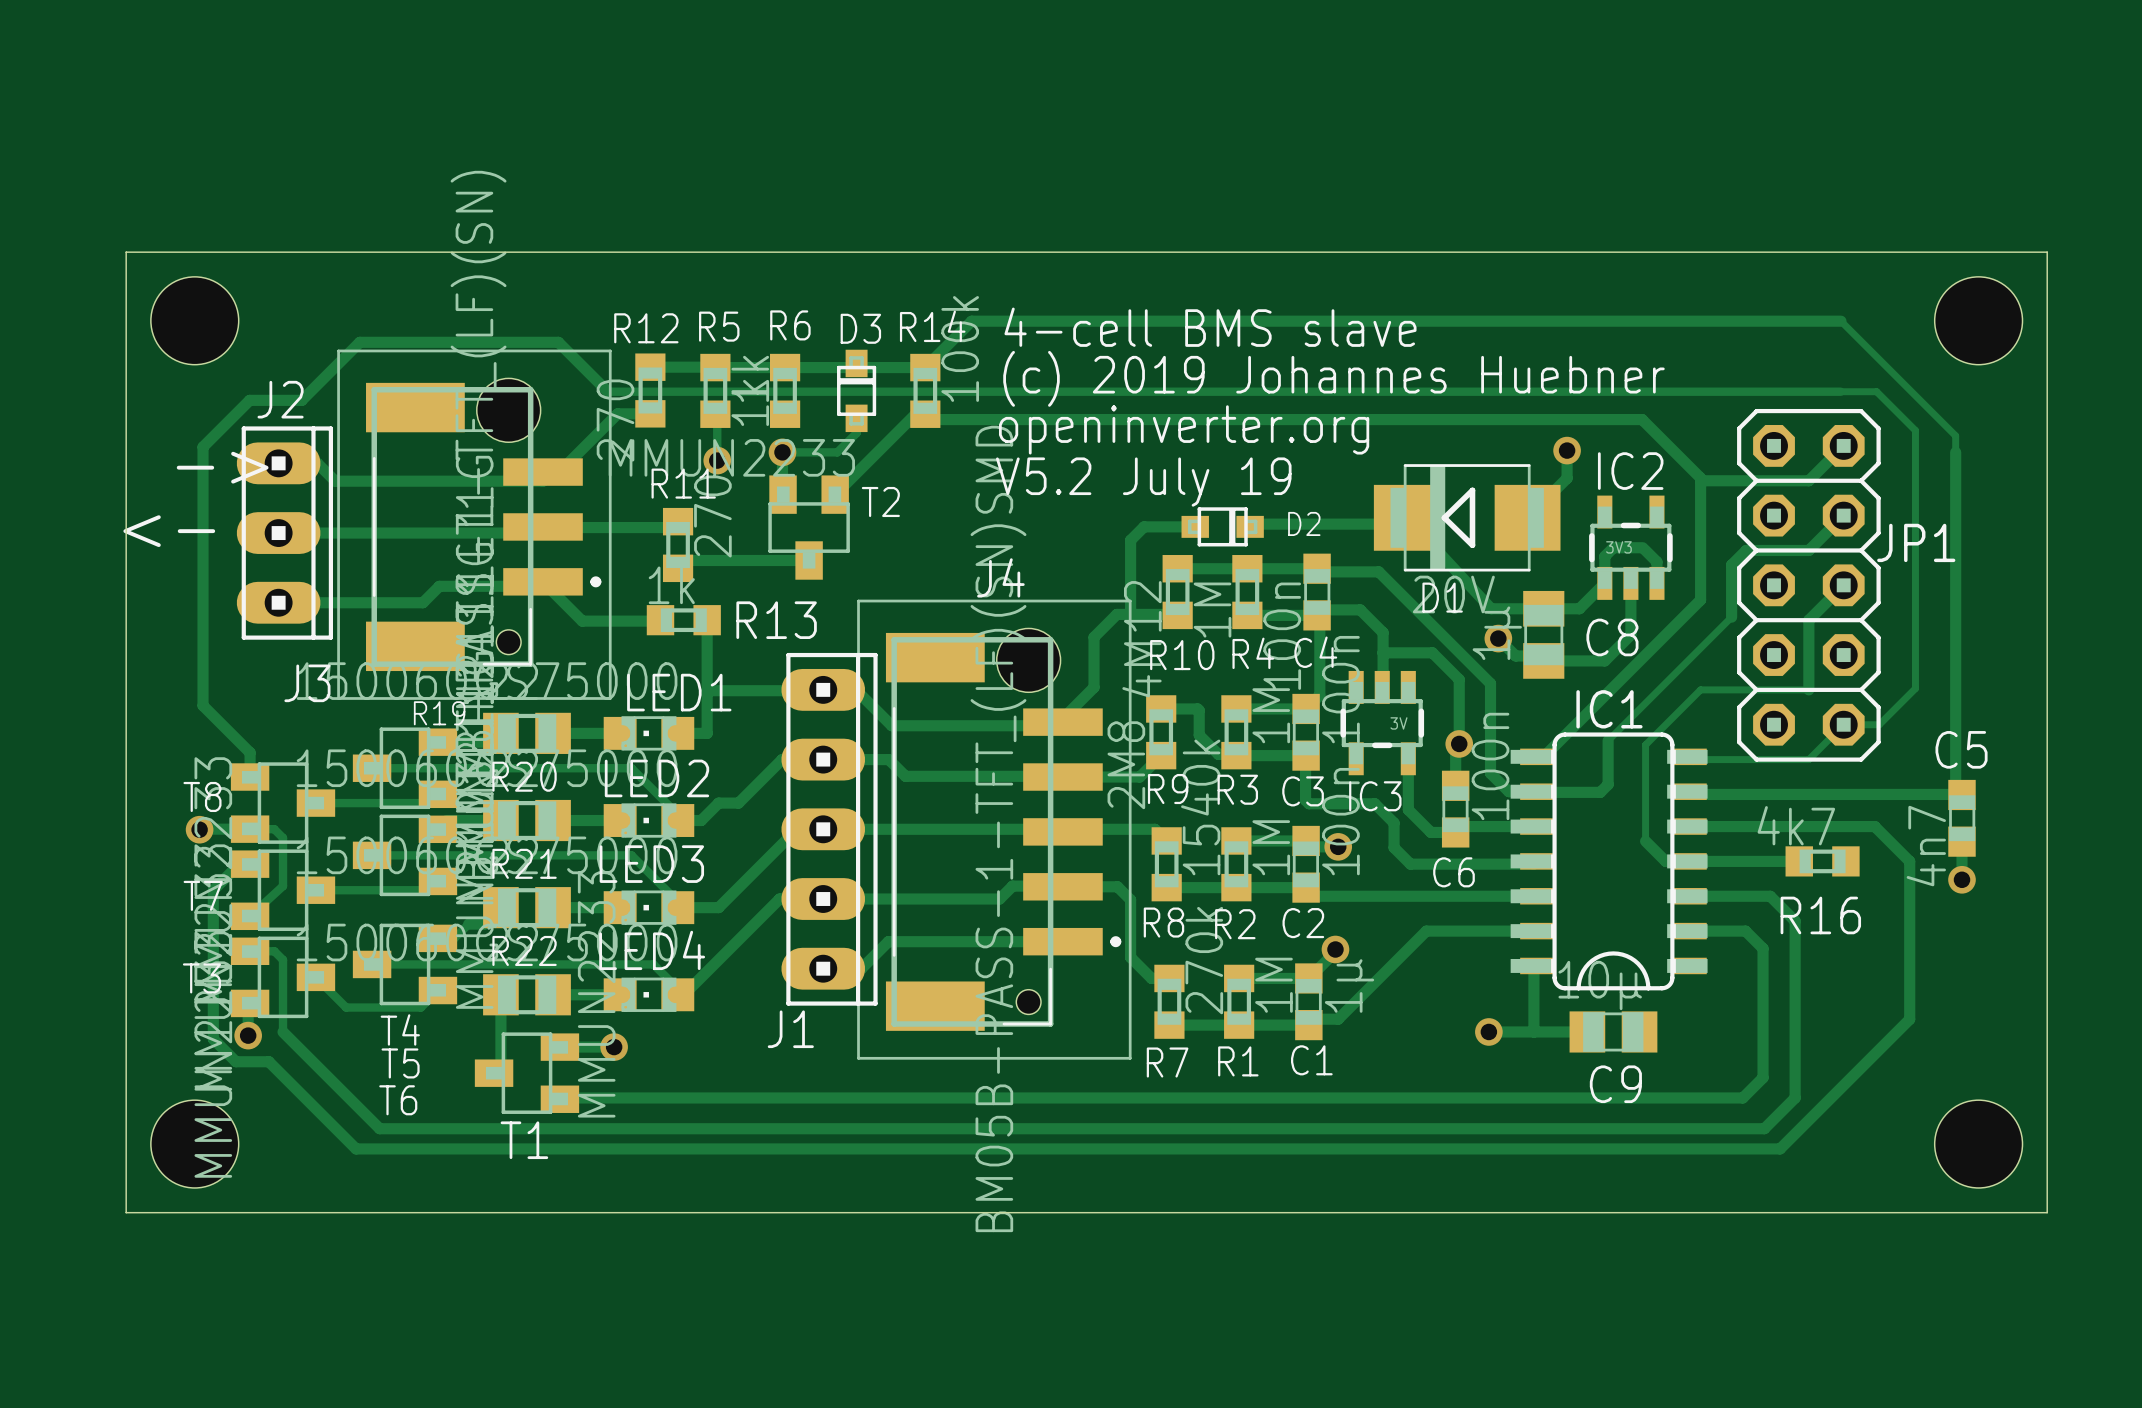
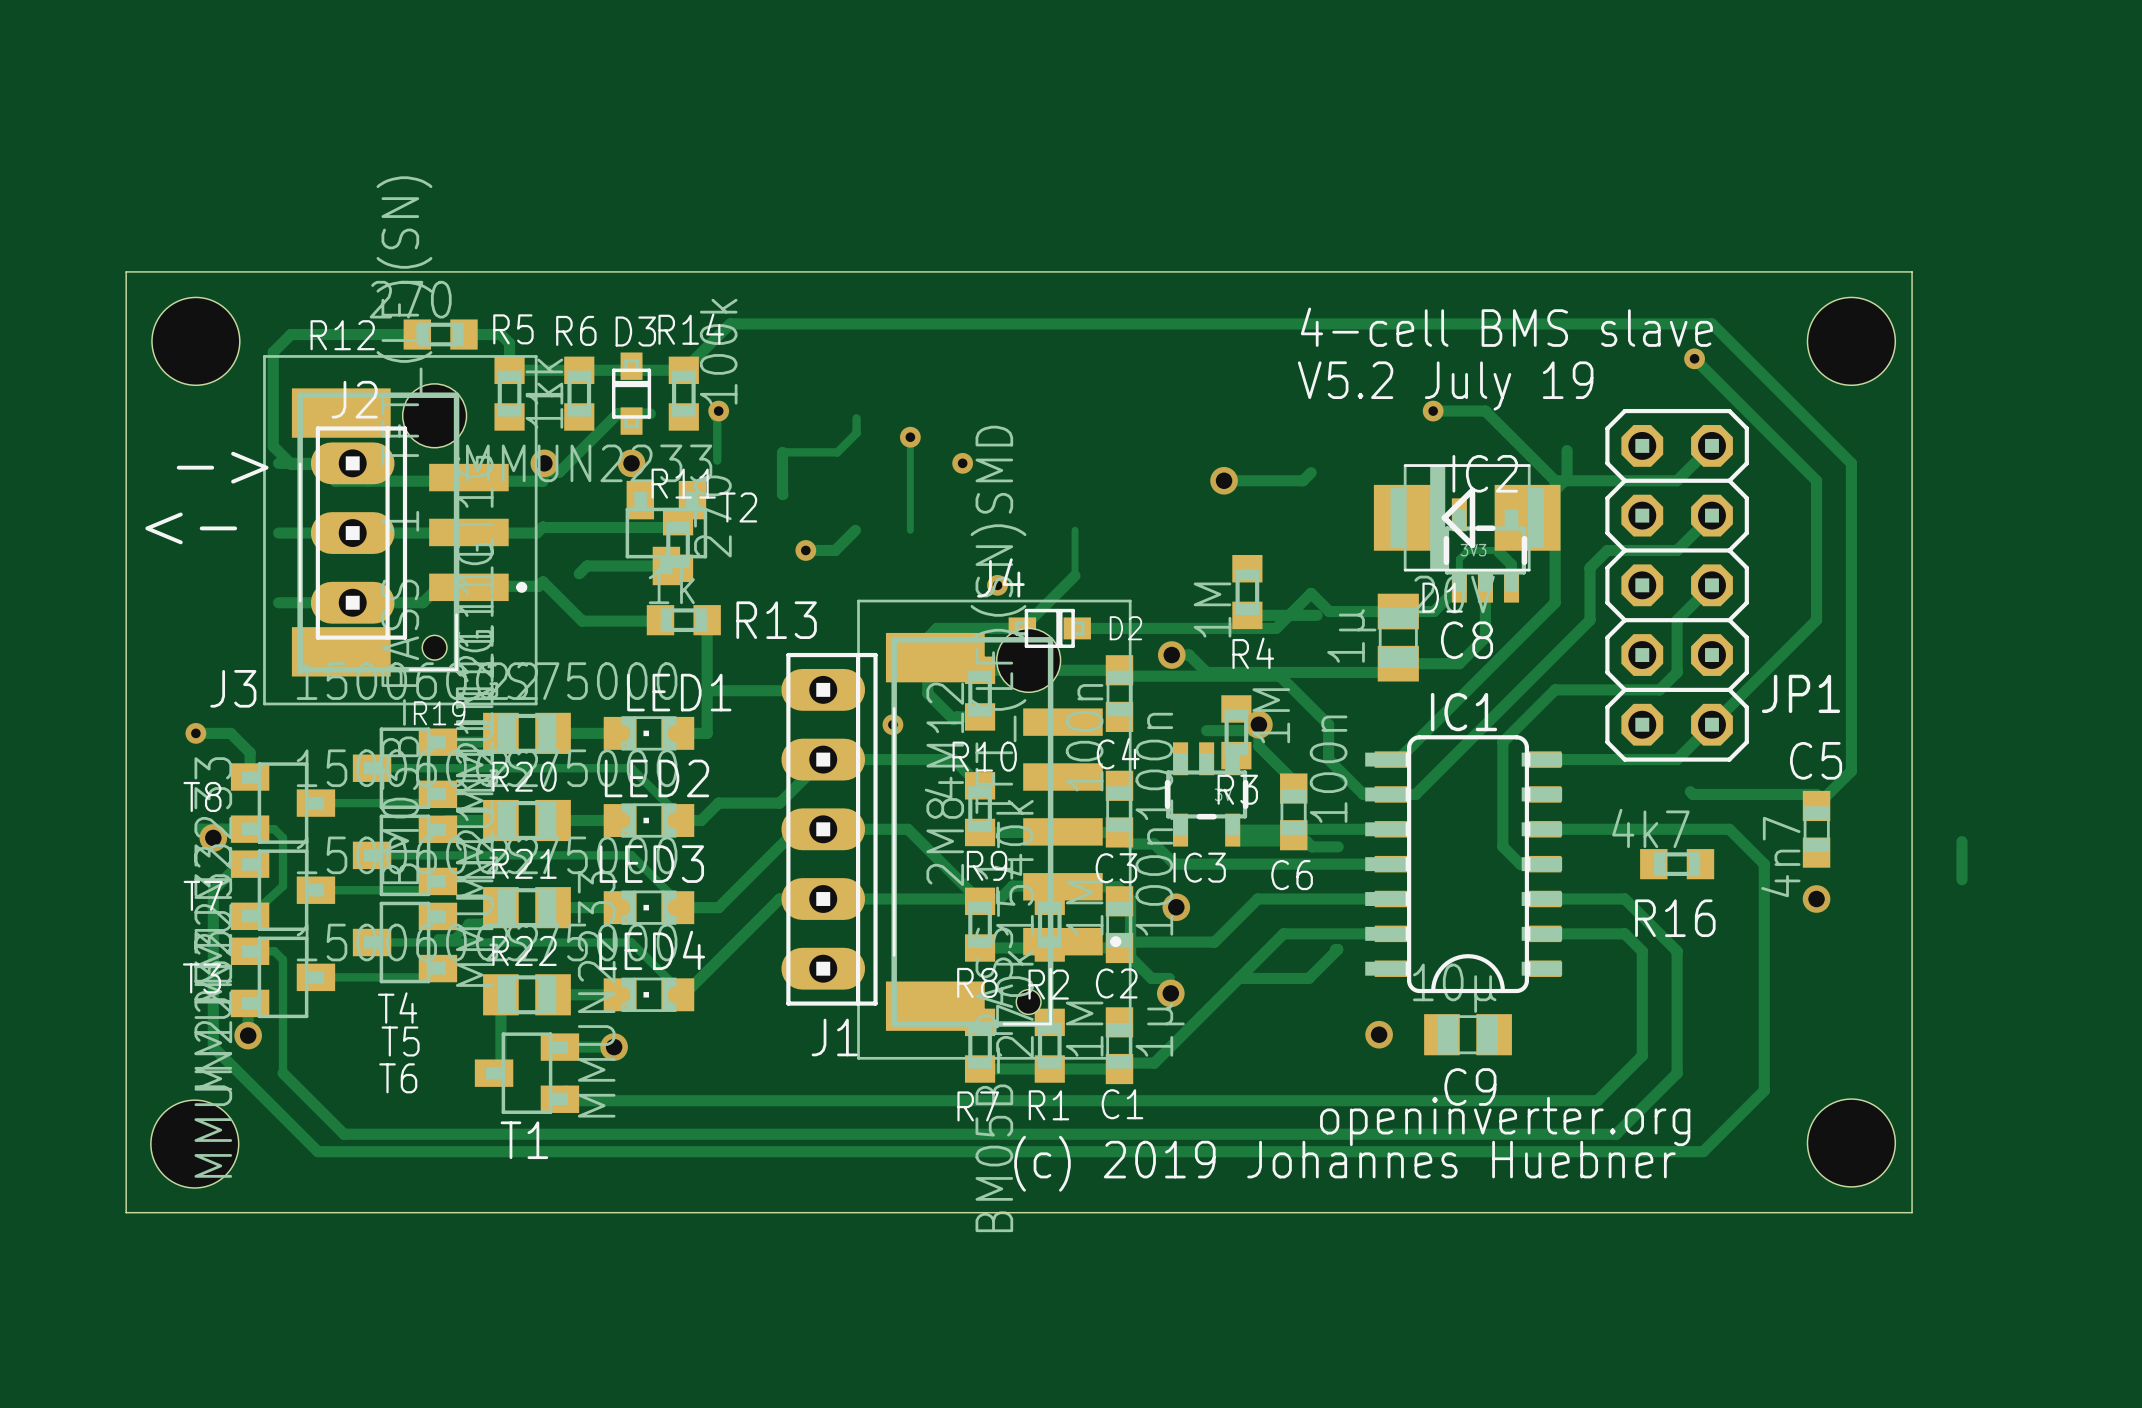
board edge: (126, 271) (126, 252) (2047, 252) (2047, 1212) (1912, 1212) -> (126, 271) (1912, 271) (1912, 1212)
hole position: (194, 320) -> (195, 341)
hole position: (1978, 320) -> (1851, 341)
R6 name position: R6 (790, 325) -> R6 (576, 330)
text position: 4-cell BMS slave (1210, 327) -> 4-cell BMS slave (1506, 327)
R12 name position: R12 (646, 328) -> R12 (342, 335)
track: none -> (417, 334) (290, 334) (273, 352) (273, 446) (291, 464) (352, 463)
track: none -> (1694, 358) (1816, 480) (1816, 620) (1677, 759) (1544, 759)
via: none -> (1694, 358)
track: (650, 367) (715, 367) -> none
track: (715, 367) (852, 367) (856, 363) (860, 367) (925, 367) (971, 321) (1840, 321) (1955, 435) (1955, 788) (1962, 794) -> none
text: (c) 2019 Johannes Huebner (1333, 378) -> none
R12 rotation: 0° (650, 390) -> 90° clockwise (440, 334)
R12 position: (650, 390) -> (440, 334)
R5 position: (715, 390) -> (509, 393)
R6 position: (785, 390) -> (579, 393)
D3 position: (856, 390) -> (631, 393)
R14 position: (925, 390) -> (683, 393)
via: none -> (718, 411)
track: none -> (1433, 411) (1485, 411) (1555, 480)
via: none -> (1433, 411)
text: openinverter.org (1184, 429) -> none
track: none -> (910, 437) (910, 530)
via: none -> (910, 437)
track: none -> (1711, 445) (1677, 480) (1555, 480)
track: (1843, 445) (1808, 480) (1700, 480) -> none
via: (1567, 450) -> none
via: (782, 452) -> none
via: (717, 460) -> none
via: none -> (544, 463)
via: none -> (631, 463)
via: none -> (962, 463)
track: none -> (1311, 472) (1303, 480) (1224, 480)
via: none -> (1224, 480)
track: none -> (1555, 480) (1555, 602) (1398, 759) (1391, 759)
text position: V5.2 July 19 (1143, 482) -> V5.2 July 19 (1445, 386)
track: (835, 494) (915, 414) (925, 414) (930, 419) (1642, 419) (1700, 478) (1700, 600) (1543, 756) (1536, 756) -> none
track: none -> (1711, 515) (1677, 550) (1607, 550) (1590, 567) (1590, 620) (1415, 794) (1363, 794) (1328, 759) (1328, 724) (1280, 676) (1125, 676) (1119, 670) (980, 670)
track: (1843, 515) (1808, 550) (1746, 550) (1731, 565) (1731, 617) (1608, 740) (1608, 784) (1600, 792) (1508, 791) (1490, 773) (1490, 683) (1378, 571) (1320, 571) (1317, 568) (1177, 568) -> none
D2 name position: D2 (1304, 523) -> D2 (1125, 628)
J3 position: (474, 524) -> (400, 530)
track: (1195, 526) (1144, 526) (1130, 540) (1130, 614) -> none
D2 position: (1222, 526) -> (1049, 628)
track: (1250, 526) (1252, 524) (1406, 524) (1406, 517) (1491, 608) (1579, 608) (1604, 583) (1604, 556) (1613, 547) (1642, 547) (1656, 561) (1656, 583) -> none
T2 position: (809, 527) -> (666, 533)
track: none -> (855, 530) (835, 550) (805, 550)
track: none -> (1075, 530) (1075, 575) (1022, 628) (936, 628) (927, 637) (927, 693) (953, 719) (956, 716) (980, 716)
text position: <- (169, 531) -> <- (191, 528)
J2 position: (284, 533) -> (359, 533)
JP1 name position: JP1 (1916, 542) -> JP1 (1800, 693)
IC2 position: (1630, 547) -> (1485, 550)
via: none -> (805, 550)
track: (809, 560) (685, 560) (678, 568) -> none
track: none -> (666, 565) (587, 565) (579, 573)
track: (1630, 583) (1630, 634) (1604, 660) (1543, 660) (1538, 655) (1515, 655) (1498, 638) -> none
via: none -> (997, 585)
JP1 position: (1808, 585) -> (1677, 585)
track: (1843, 585) (1808, 620) (1808, 689) (1700, 689) (1645, 744) (1645, 841) (1665, 861) (1799, 861) -> none
track: none -> (1485, 586) (1485, 637) (1459, 663) (1398, 663) (1389, 672) (1206, 672) (1189, 655) (1171, 655)
track: none -> (1511, 586) (1511, 564) (1497, 550) (1468, 550) (1459, 559) (1459, 586) (1433, 611) (1329, 611) (1311, 593) (1276, 628) (1077, 628)
R10 position: (1177, 592) -> (980, 693)
C4 position: (1317, 592) -> (1119, 693)
track: (1177, 615) (1116, 614) (1094, 637) (1094, 687) (1055, 725) (891, 725) (856, 690) (822, 690) -> none
C8 position: (1543, 634) -> (1398, 637)
via: (1498, 638) -> none
track: (1383, 652) (1432, 652) (1459, 679) (1459, 743) (1455, 747) (1455, 785) -> none
via: none -> (1171, 655)
track: (1382, 687) (1383, 632) (1360, 609) (1322, 609) (1317, 615) (1319, 618) (1319, 695) (1306, 708) (1236, 708) -> none
track: (1161, 708) (1197, 708) (1199, 735) (1218, 754) (1305, 755) (1305, 800) (1308, 803) (1374, 803) (1394, 822) (1394, 847) (1410, 864) (1520, 864) -> (1711, 585) (1677, 620) (1677, 672) (1659, 689) (1555, 689) (1502, 742) (1502, 846) (1520, 864)
IC3 position: (1382, 723) -> (1206, 794)
via: none -> (892, 724)
via: none -> (1258, 724)
track: none -> (1206, 730) (1253, 730) (1258, 724) (1258, 746) (1293, 781) (1293, 788)
R9 position: (1161, 732) -> (980, 809)
C3 position: (1306, 732) -> (1119, 809)
via: none -> (195, 733)
track: (230, 733) (203, 705) (203, 447) (249, 400) (301, 400) (359, 342) (558, 342) (607, 391) (1876, 391) (1915, 430) (1915, 688) (1879, 724) (1843, 724) (1808, 759) (1693, 759) (1690, 756) -> (230, 733) (195, 733)
via: (1459, 743) -> none
track: (1161, 755) (1139, 777) (905, 776) (888, 759) -> (980, 785) (953, 759) (888, 759)
track: (1408, 758) (1408, 809) (1430, 832) (1455, 832) (1461, 826) (1536, 826) -> none
track: (823, 759) (782, 759) (738, 803) -> (823, 759) (779, 803) (738, 803)
track: (1816, 794) (1961, 794) -> (1816, 794) (1816, 805) (1851, 771) (1851, 463) (1711, 323) (730, 323) (683, 370) (635, 370) (631, 366) (627, 370) (509, 370) (509, 343) (500, 334) (463, 334)
C6 position: (1455, 809) -> (1293, 811)
C5 position: (1962, 818) -> (1816, 829)
track: (1690, 826) (1874, 826) (1909, 861) (1909, 1019) (1780, 1148) (356, 1148) (268, 1061) (235, 1061) (213, 1039) -> (1544, 829) (1729, 829) (1764, 864) (1764, 1090) (1703, 1151) (317, 1151) (213, 1047) (213, 1039)
via position: (199, 829) -> (213, 837)
track: (908, 829) (1060, 829) (1062, 831) (1065, 829) (1155, 829) (1166, 840) -> (908, 829) (980, 901)
track: none -> (1391, 829) (1299, 829) (1293, 835) (1288, 830) (1232, 830)
track: none -> (980, 832) (1119, 832) (1131, 843) (1154, 843) (1174, 864) (1391, 864)
via: (1338, 846) -> none
IC1 position: (1609, 861) -> (1463, 864)
R16 position: (1822, 861) -> (1677, 864)
R8 position: (1166, 864) -> (980, 924)
R2 position: (1236, 864) -> (1049, 924)
C2 position: (1306, 864) -> (1119, 924)
via position: (1962, 879) -> (1816, 899)
track: (1166, 887) (1306, 887) (1314, 895) -> none
track: (1314, 896) (1536, 896) -> none
track: (1690, 896) (1770, 896) (1795, 921) (1795, 1097) (1764, 1128) (379, 1128) (283, 1032) -> (1544, 899) (1624, 899) (1677, 951) (1677, 1073) (1616, 1134) (344, 1134) (283, 1073) (283, 1032)
track: none -> (1391, 899) (1257, 899) (1214, 942) (1125, 942) (1119, 947) (980, 947)
via: none -> (1176, 907)
track: (1536, 931) (1426, 931) (1338, 1019) (1314, 1019) (1308, 1025) (1169, 1025) -> none
track: (1690, 931) (1745, 931) (1763, 948) (1763, 1077) (1742, 1097) (559, 1099) -> none
track: none -> (1391, 933) (1283, 933) (1154, 1063) (1125, 1063) (1119, 1069) (980, 1069)
track: none -> (1544, 933) (1624, 933) (1642, 951) (1642, 1055) (1597, 1100) (561, 1100) (559, 1099) (565, 1090)
track: (1062, 941) (888, 941) (861, 968) (823, 968) -> none
via: (1335, 949) -> none
track: (372, 964) (653, 964) -> (372, 942) (631, 942) (653, 964)
T6 position: (405, 964) -> (405, 942)
track: (1536, 965) (1533, 965) (1533, 1031) -> none
track: (315, 977) (346, 1007) (420, 1007) (437, 990) -> (315, 977) (429, 977) (437, 968)
via: none -> (1170, 993)
R7 position: (1169, 1001) -> (980, 1045)
R1 position: (1239, 1001) -> (1049, 1045)
C1 position: (1308, 1001) -> (1119, 1045)
T4 name position: T4 (400, 1029) -> T4 (397, 1008)
J1 name position: J1 (790, 1029) -> J1 (834, 1037)
track: (1488, 1031) (1587, 1031) -> none
via: (1488, 1031) -> none
C9 position: (1613, 1031) -> (1468, 1034)
via: none -> (1379, 1034)
T5 name position: T5 (400, 1063) -> T5 (400, 1041)
text: none -> openinverter.org (1505, 1121)
hole position: (1978, 1144) -> (1851, 1142)
text: none -> (c) 2019 Johannes Huebner (1344, 1163)

